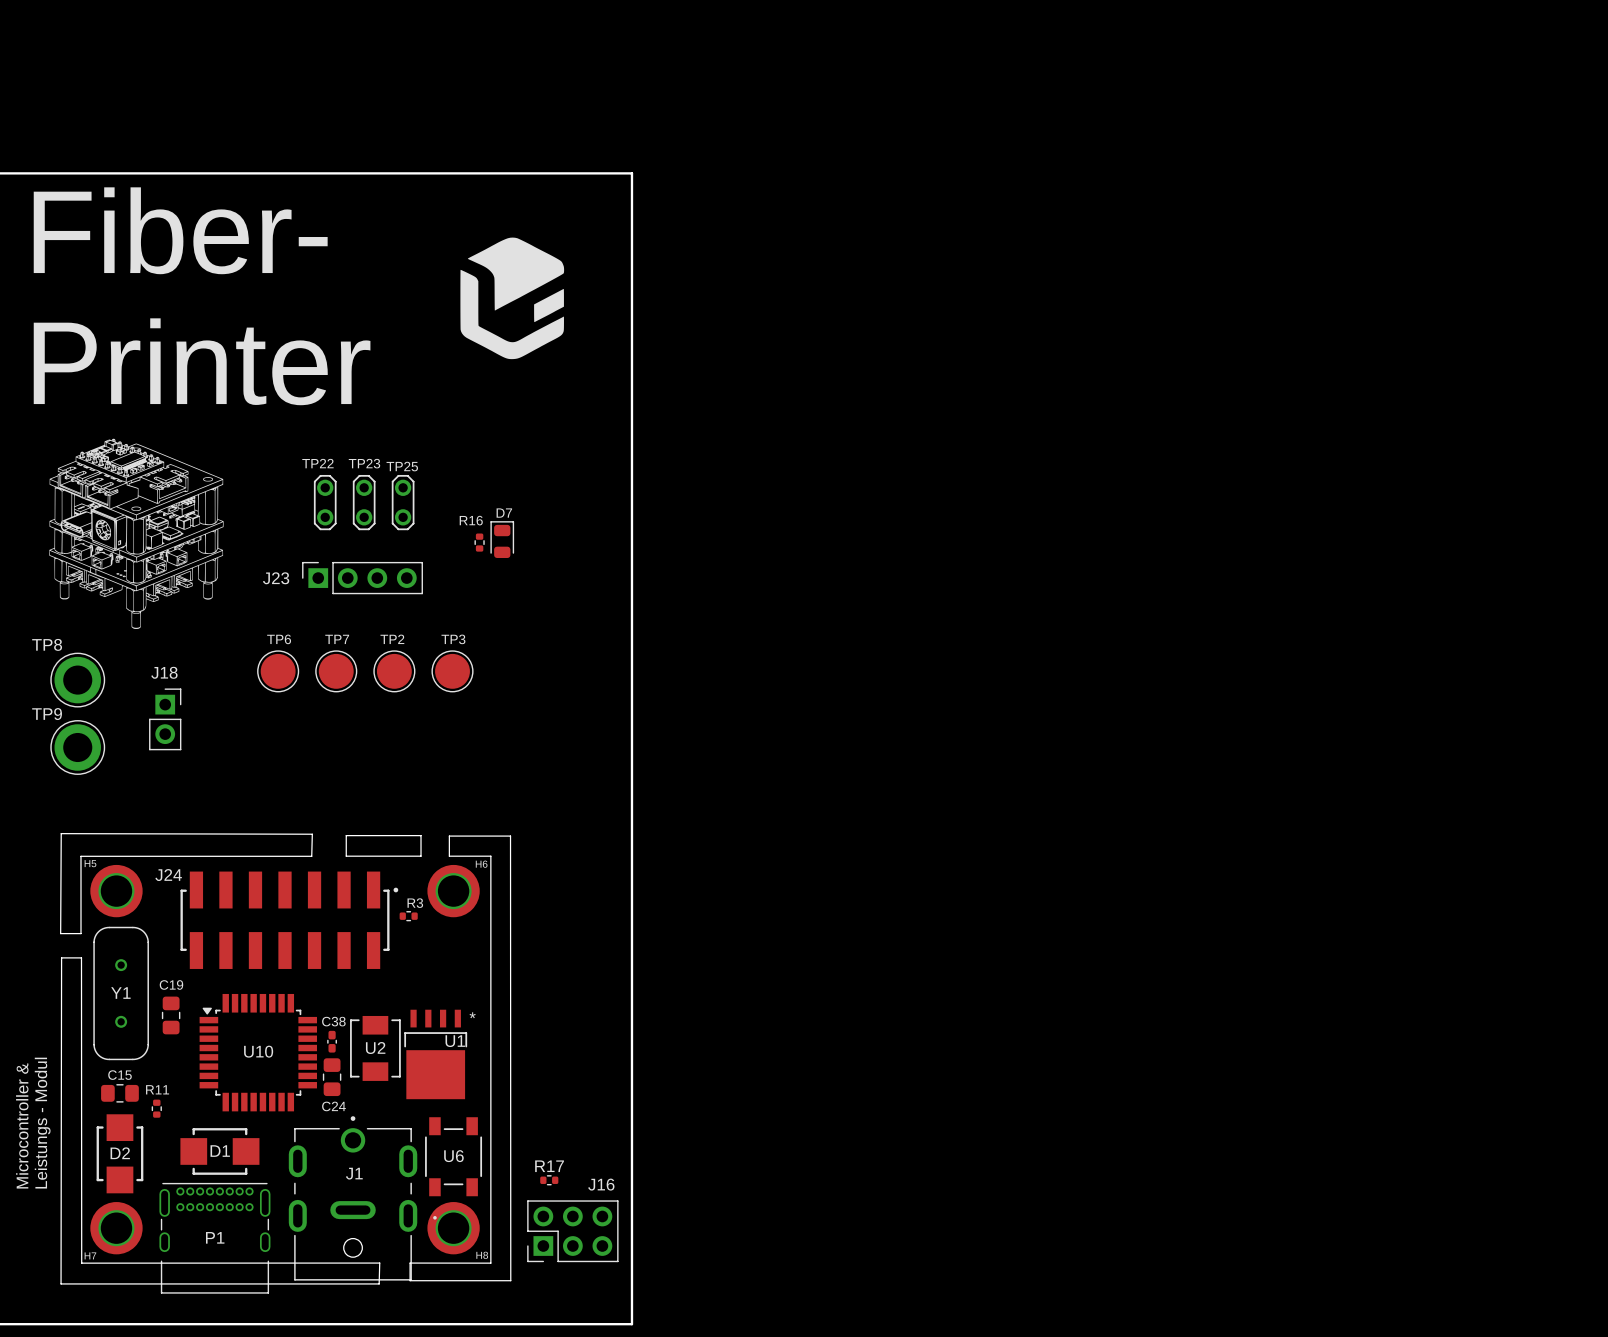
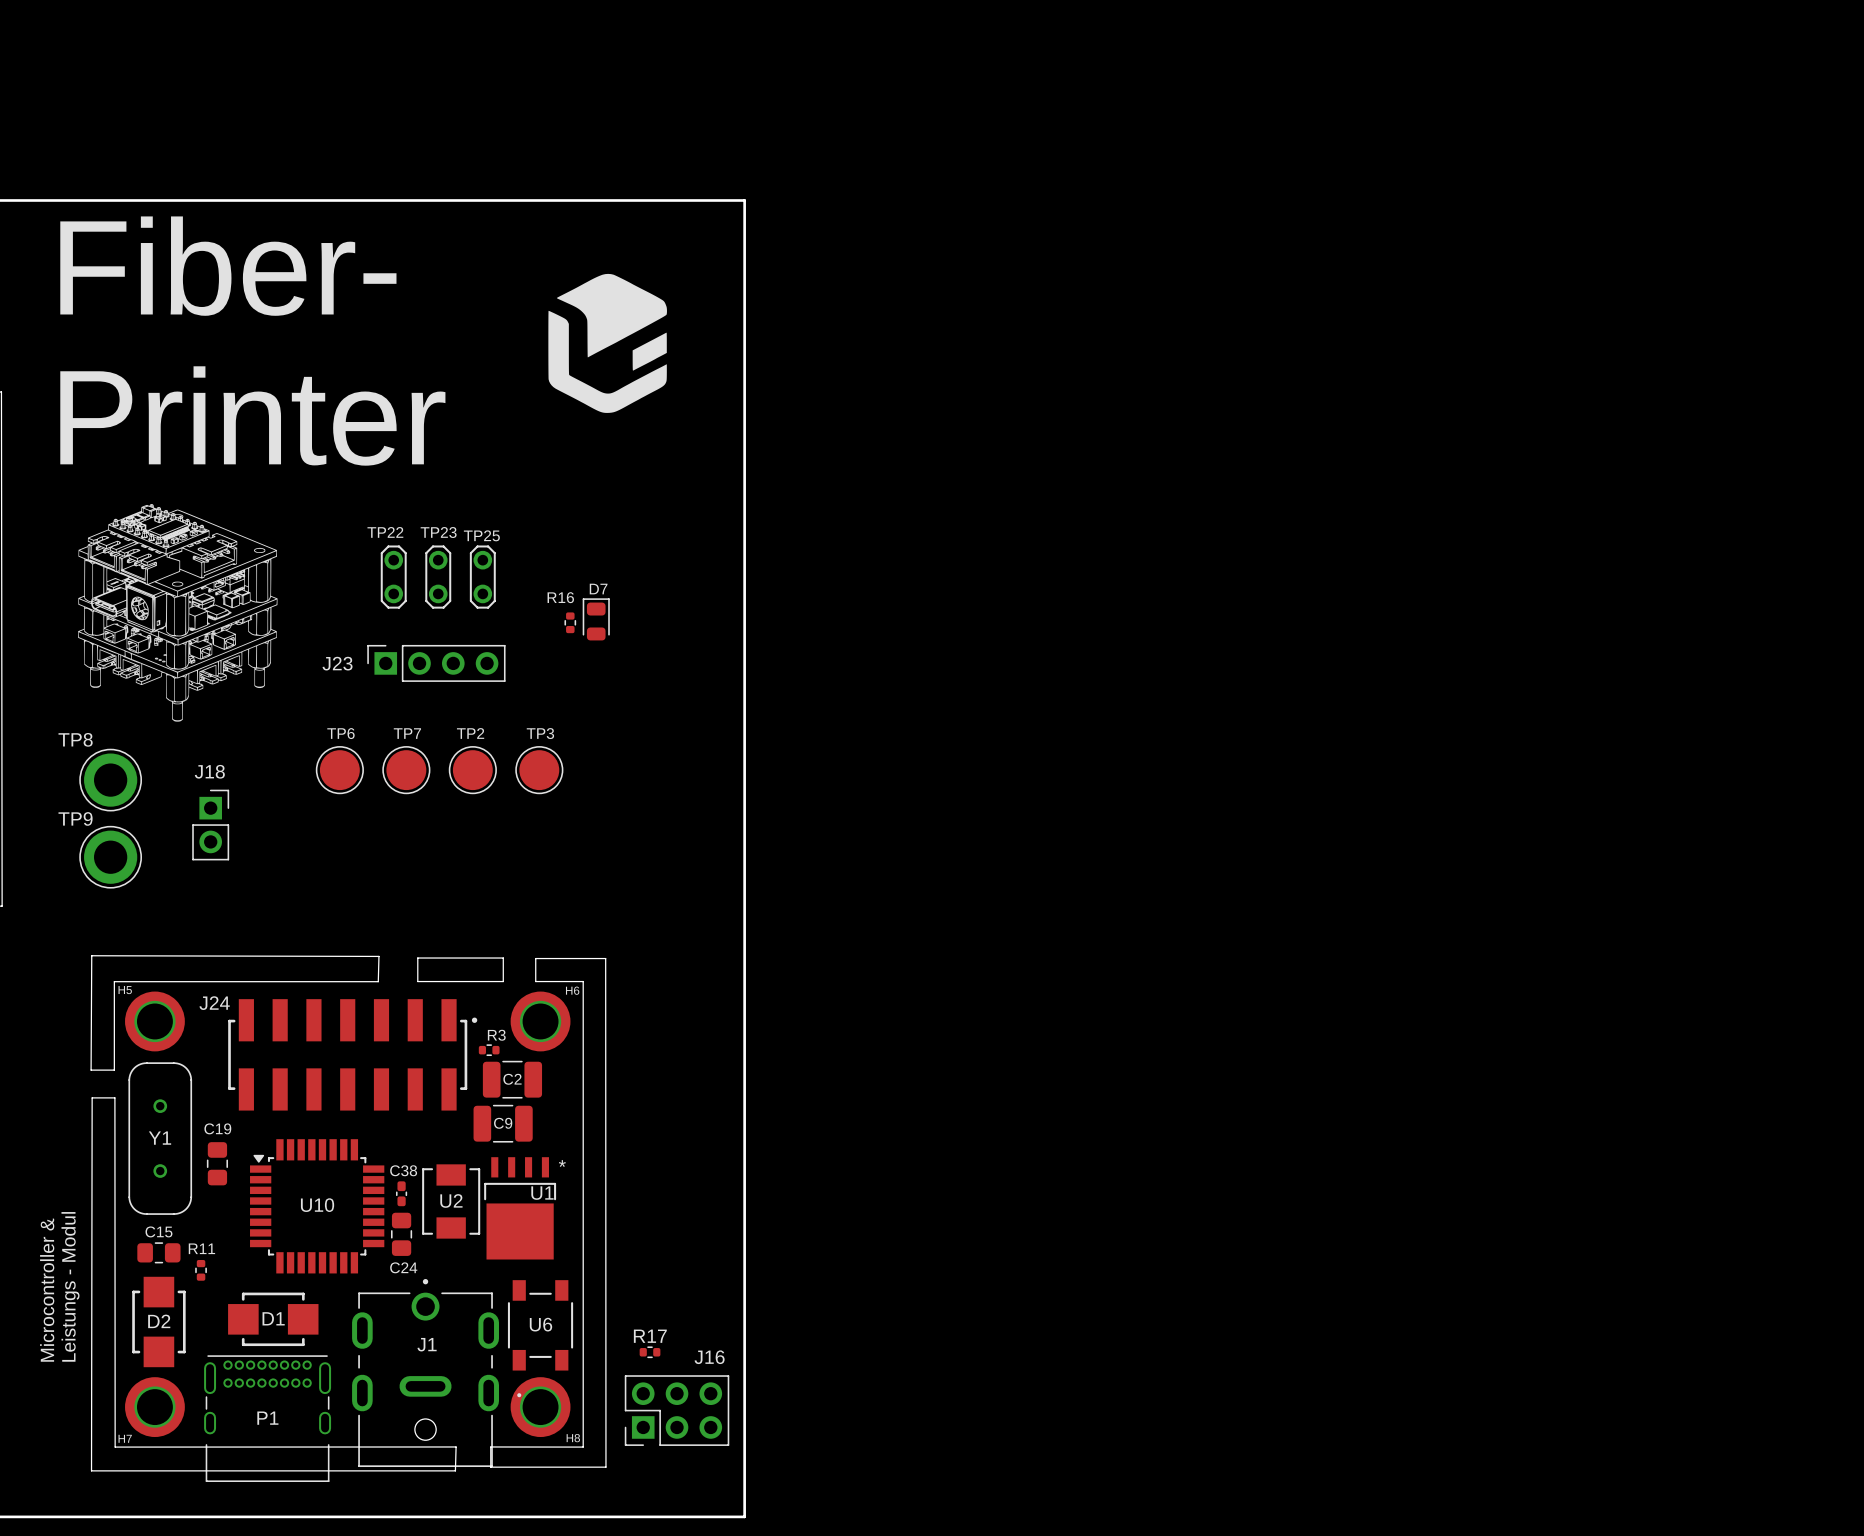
C2: none -> (512, 1079)
C9: none -> (503, 1123)

